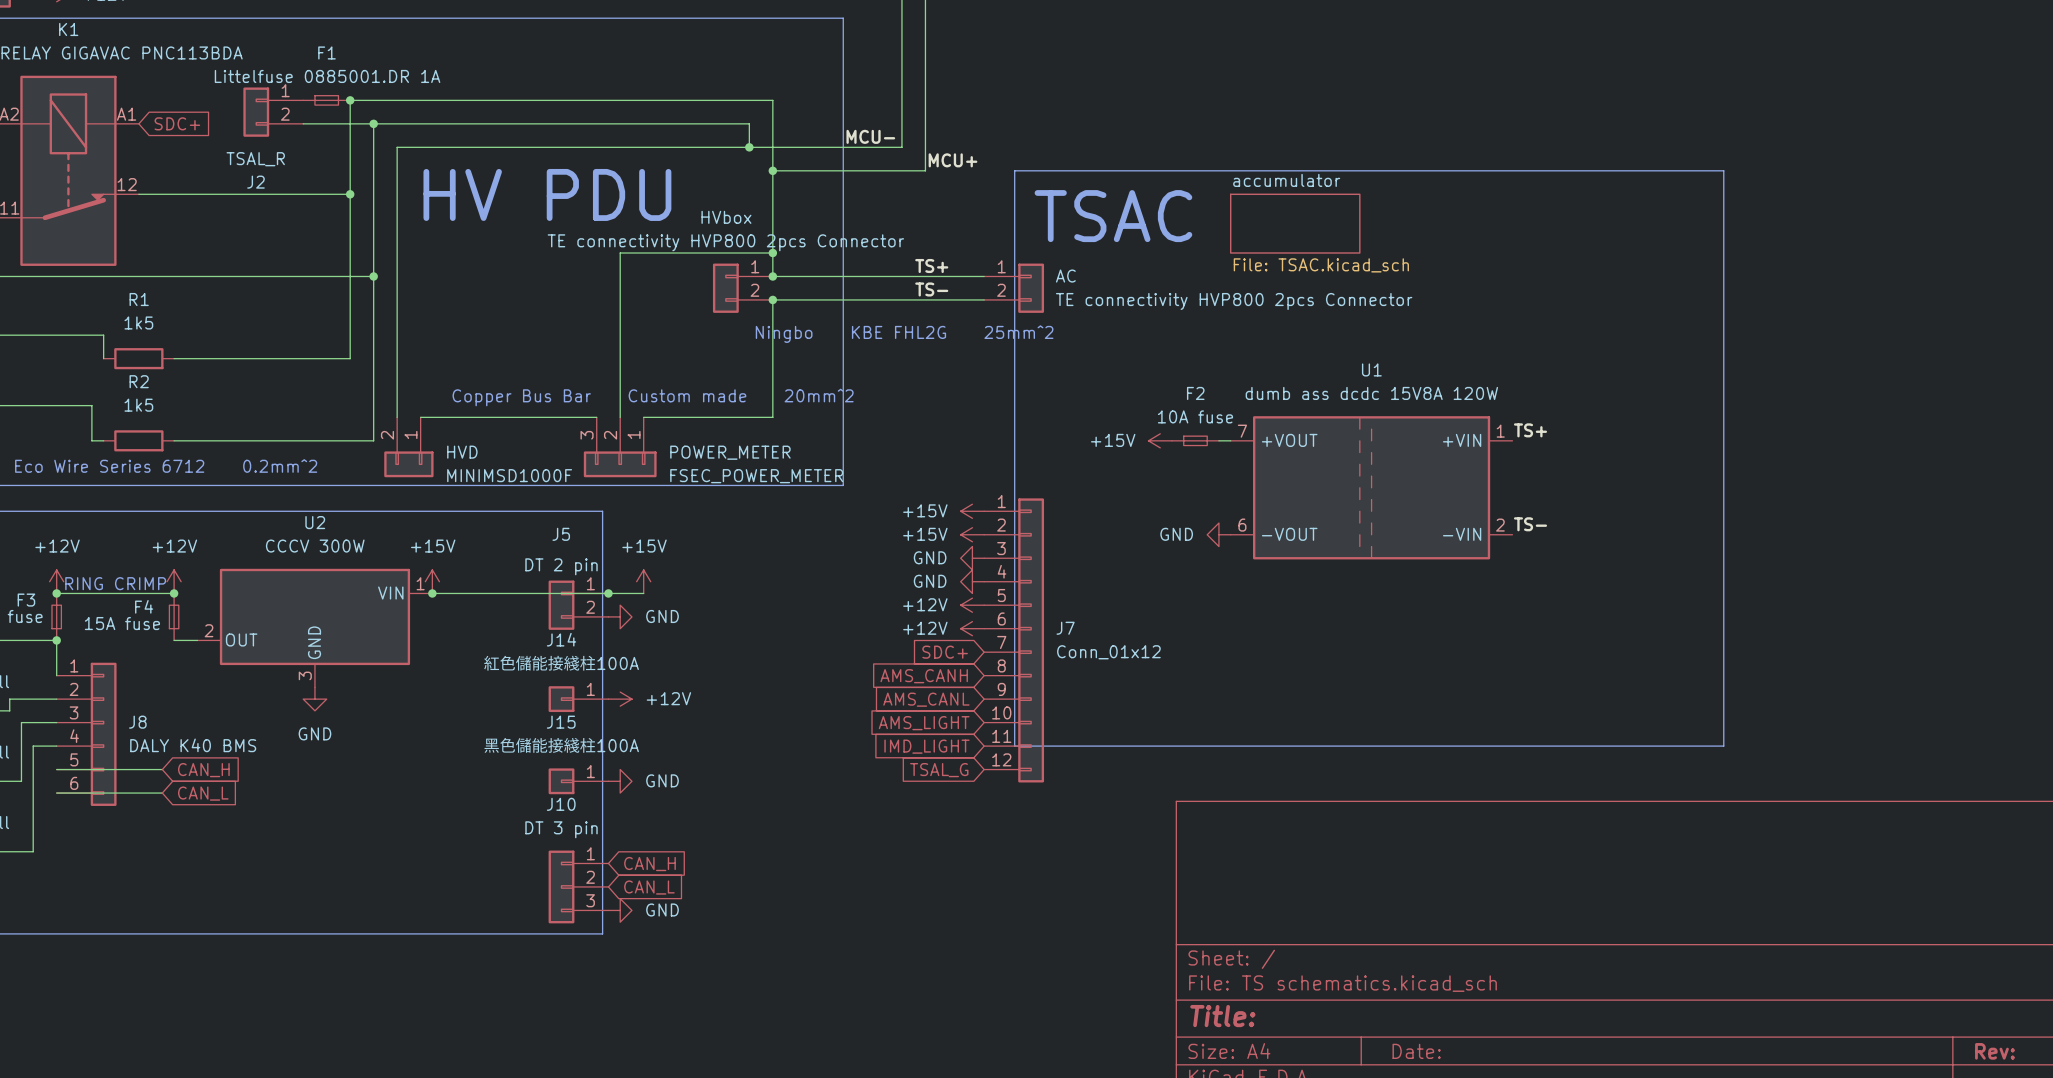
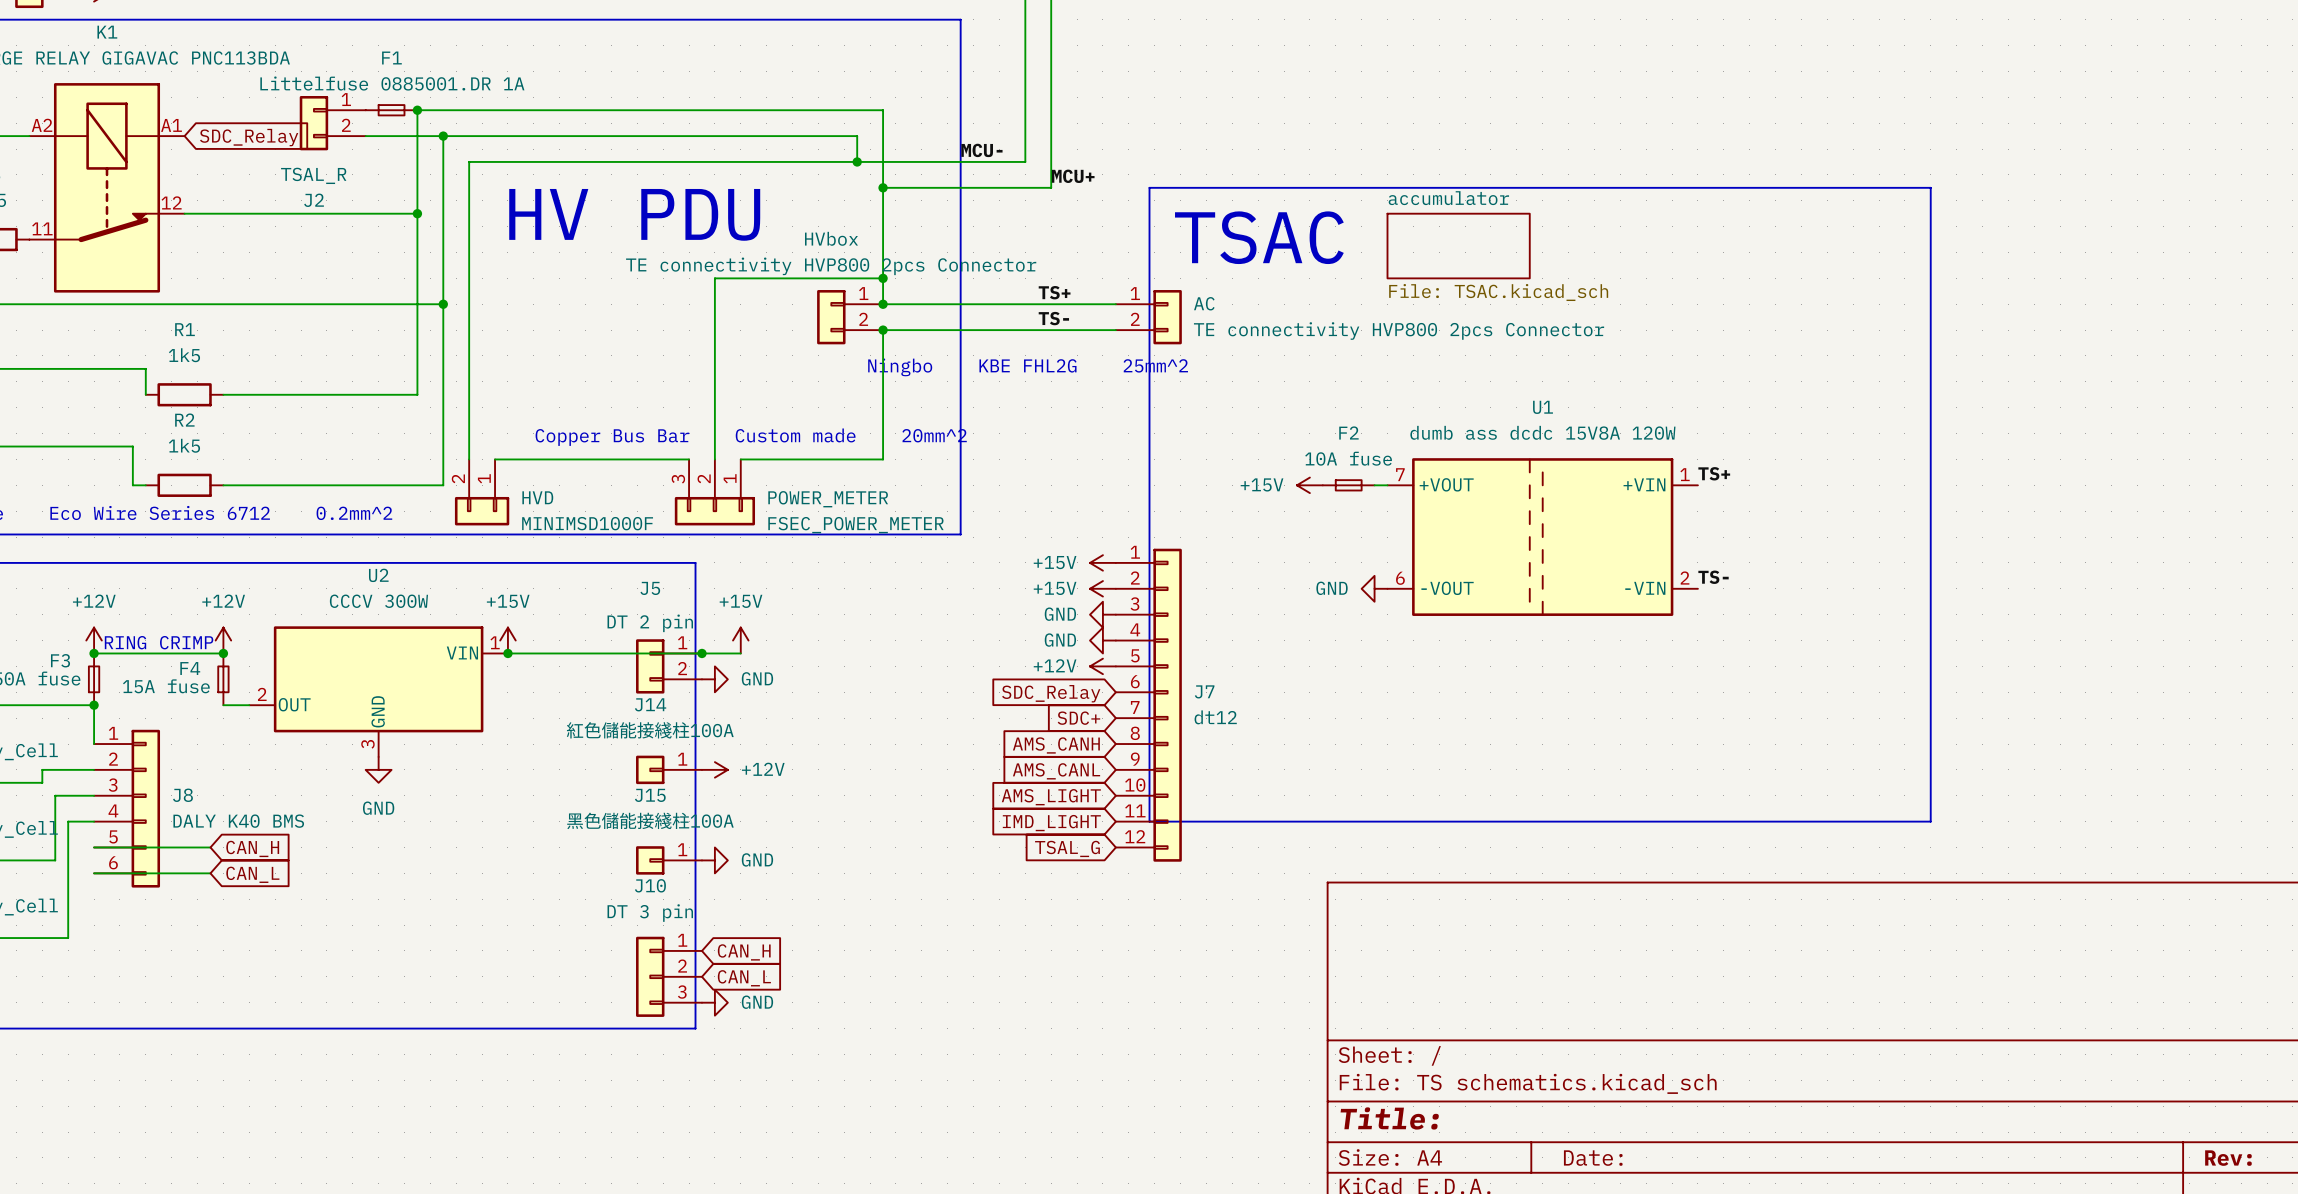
global label: SDC+ (177, 123) -> SDC_Relay (249, 137)
power symbol: +12V (972, 628) -> none
global label: none -> SDC_Relay (1051, 693)
J7 value: Conn_01x12 (1108, 652) -> dt12 (1215, 717)

